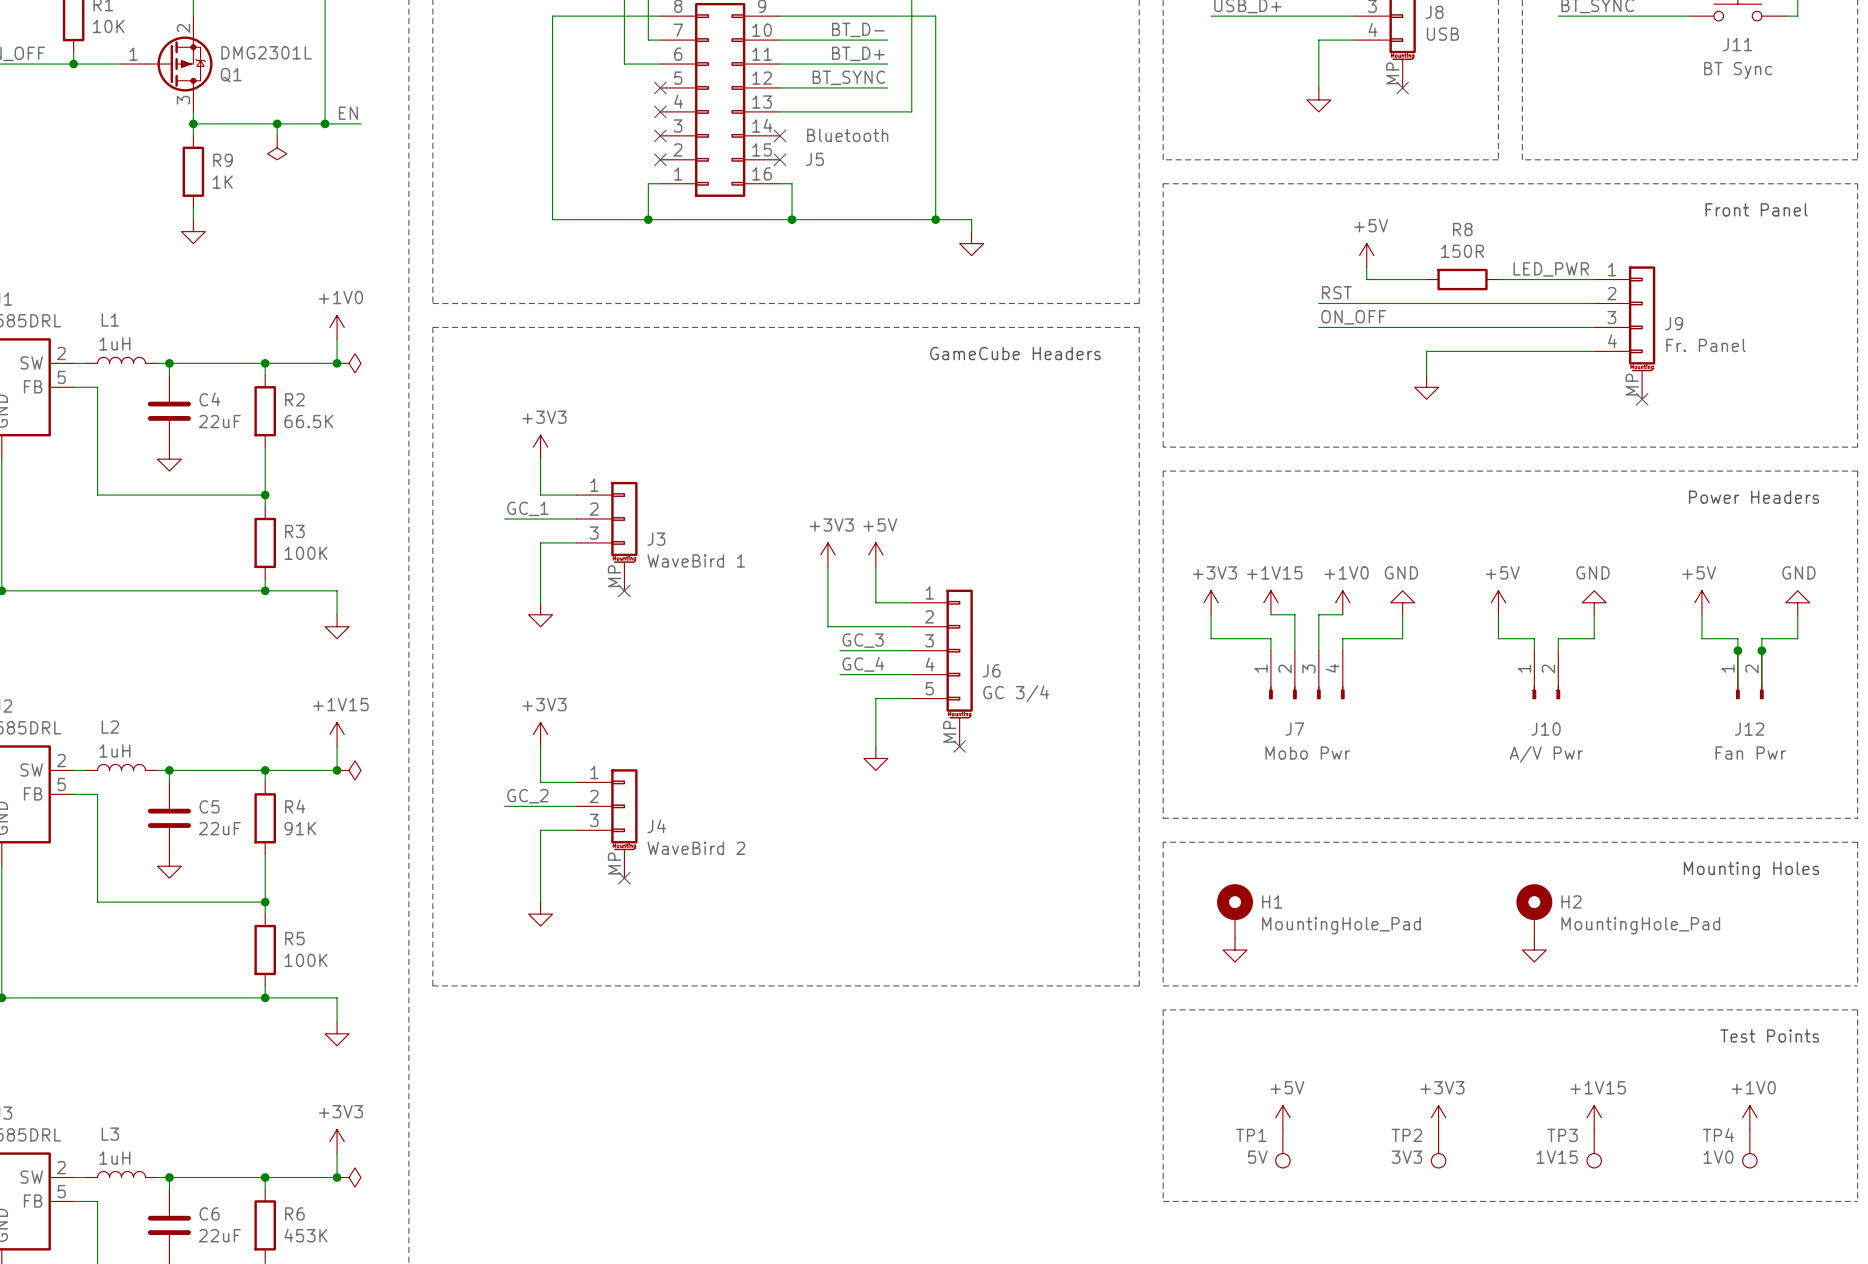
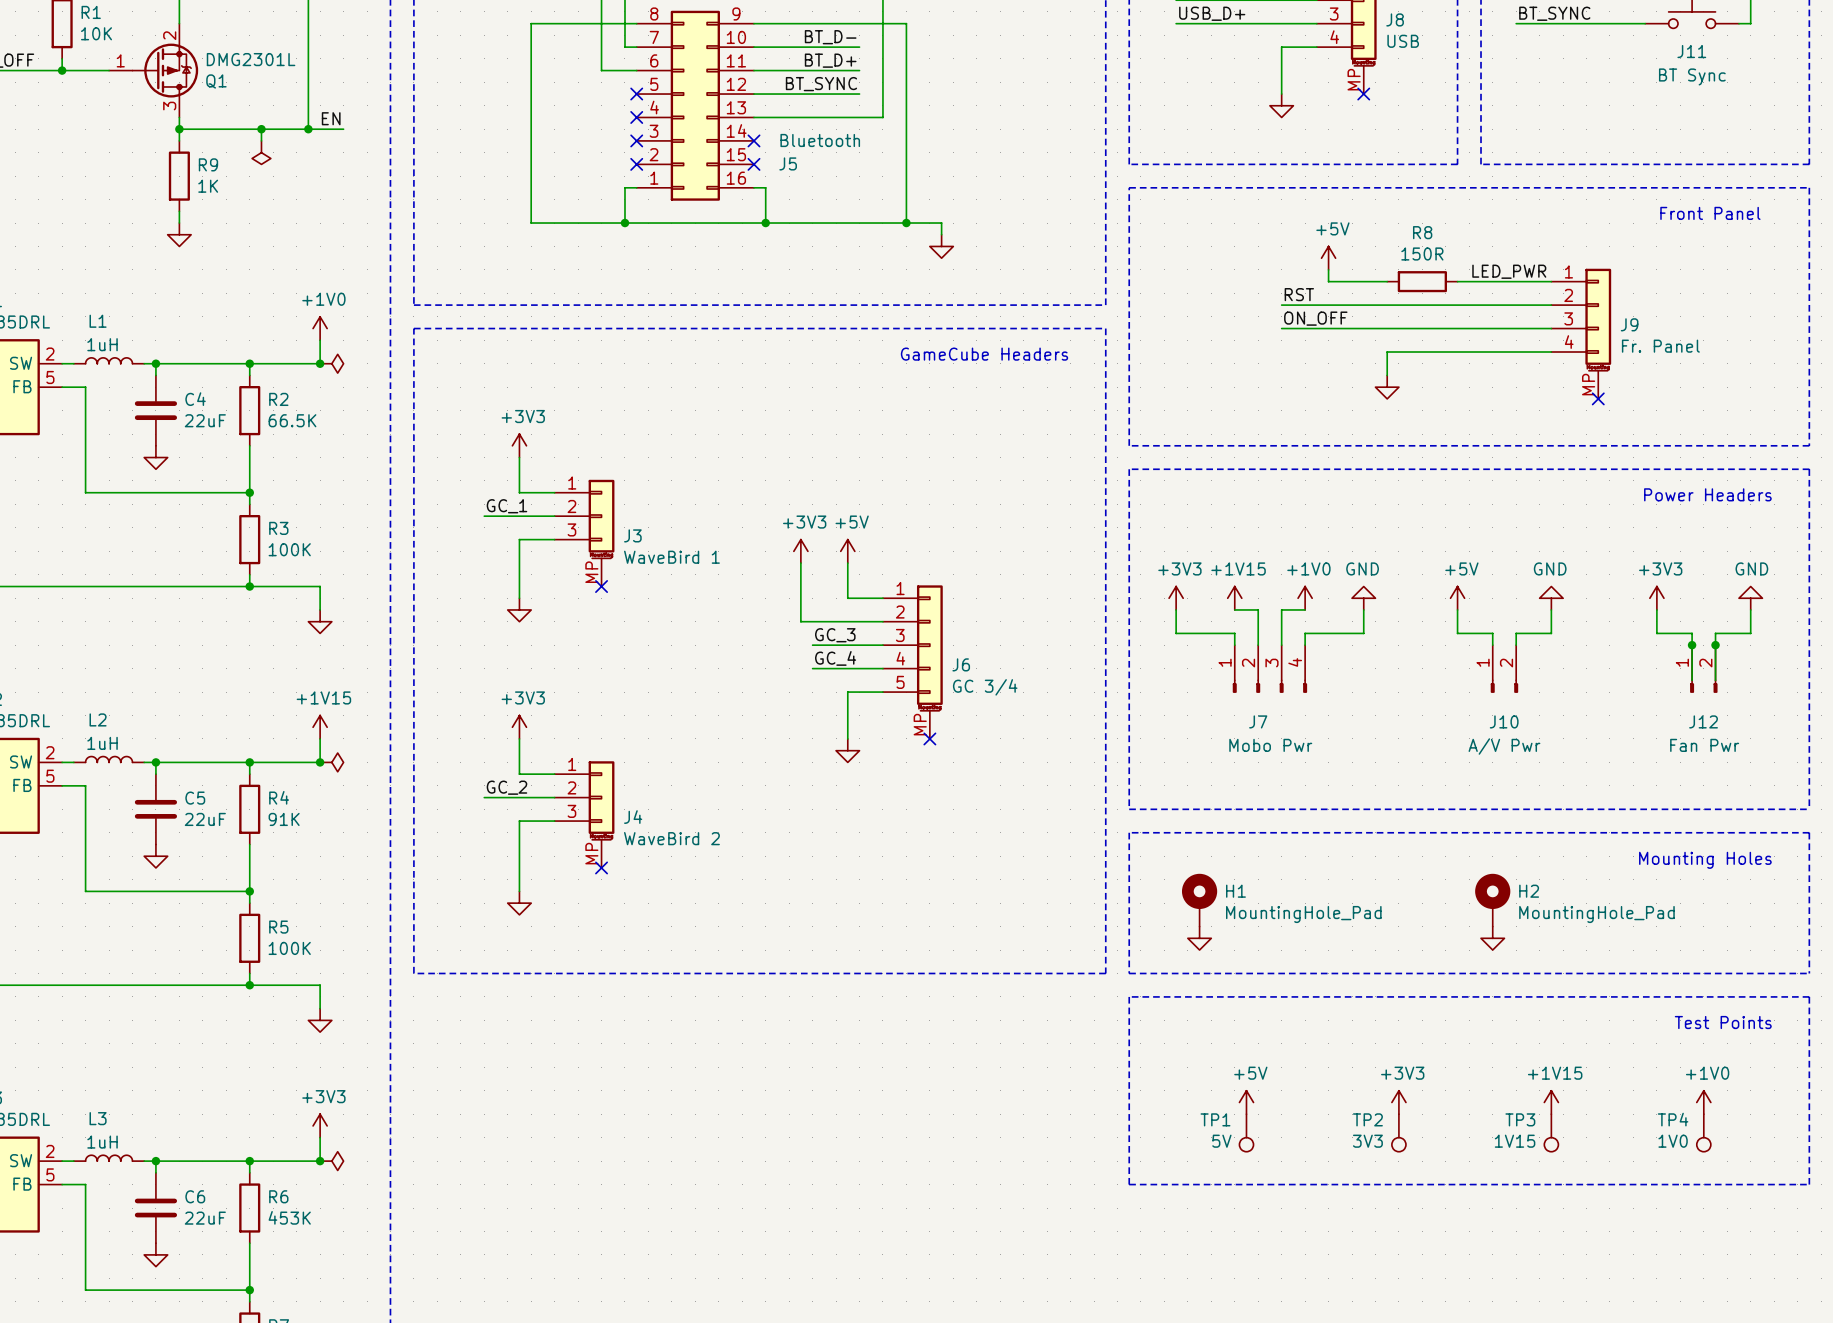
power symbol: +5V (1701, 602) -> +3V3 (1656, 598)

